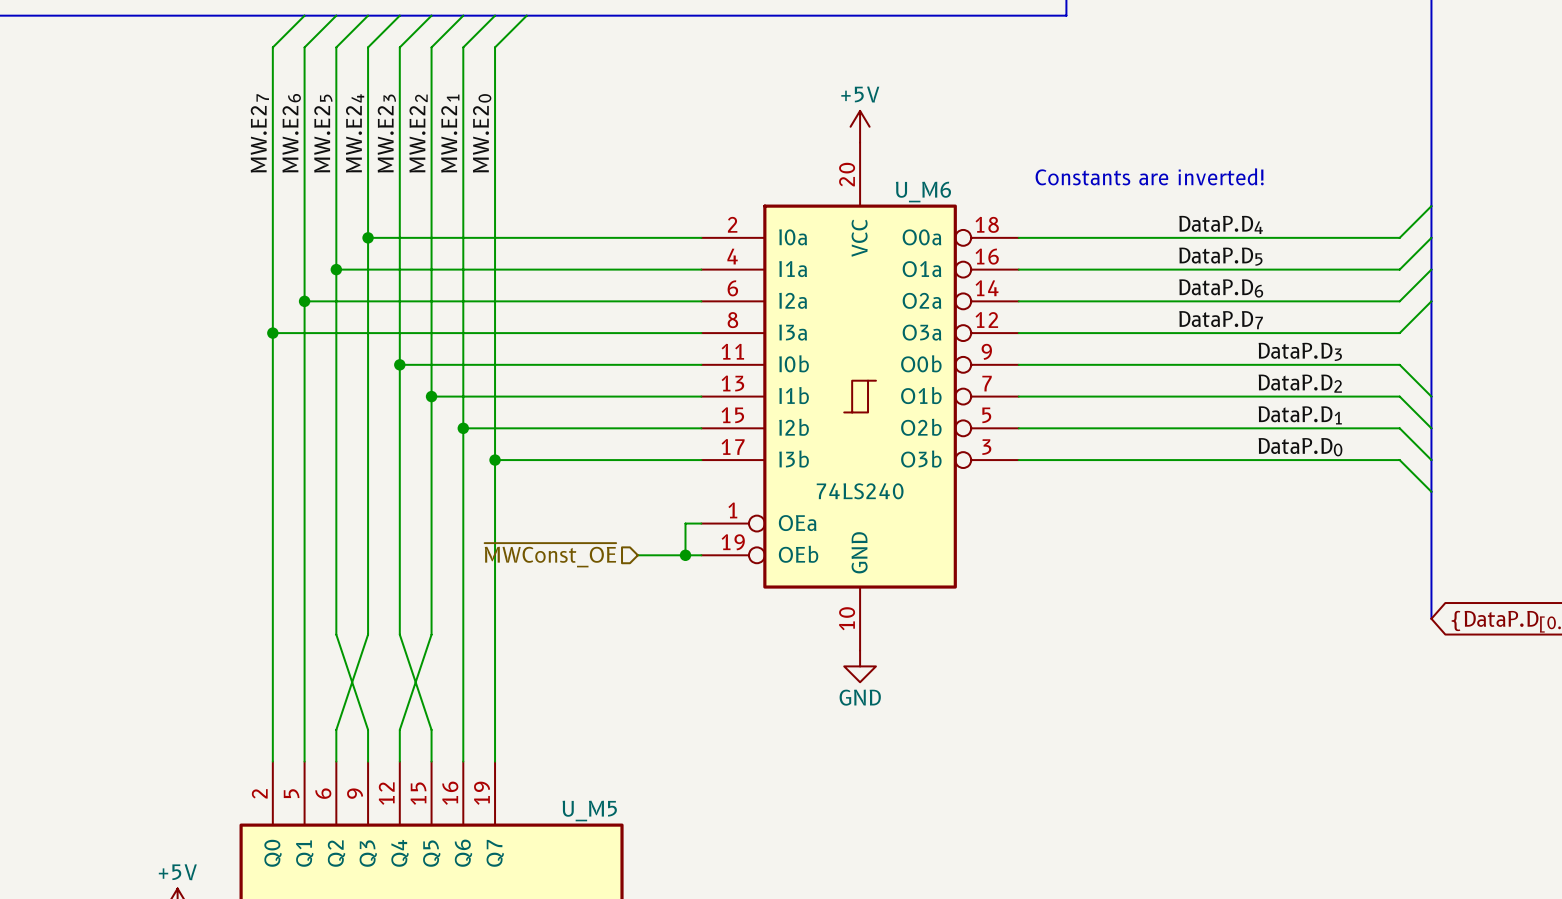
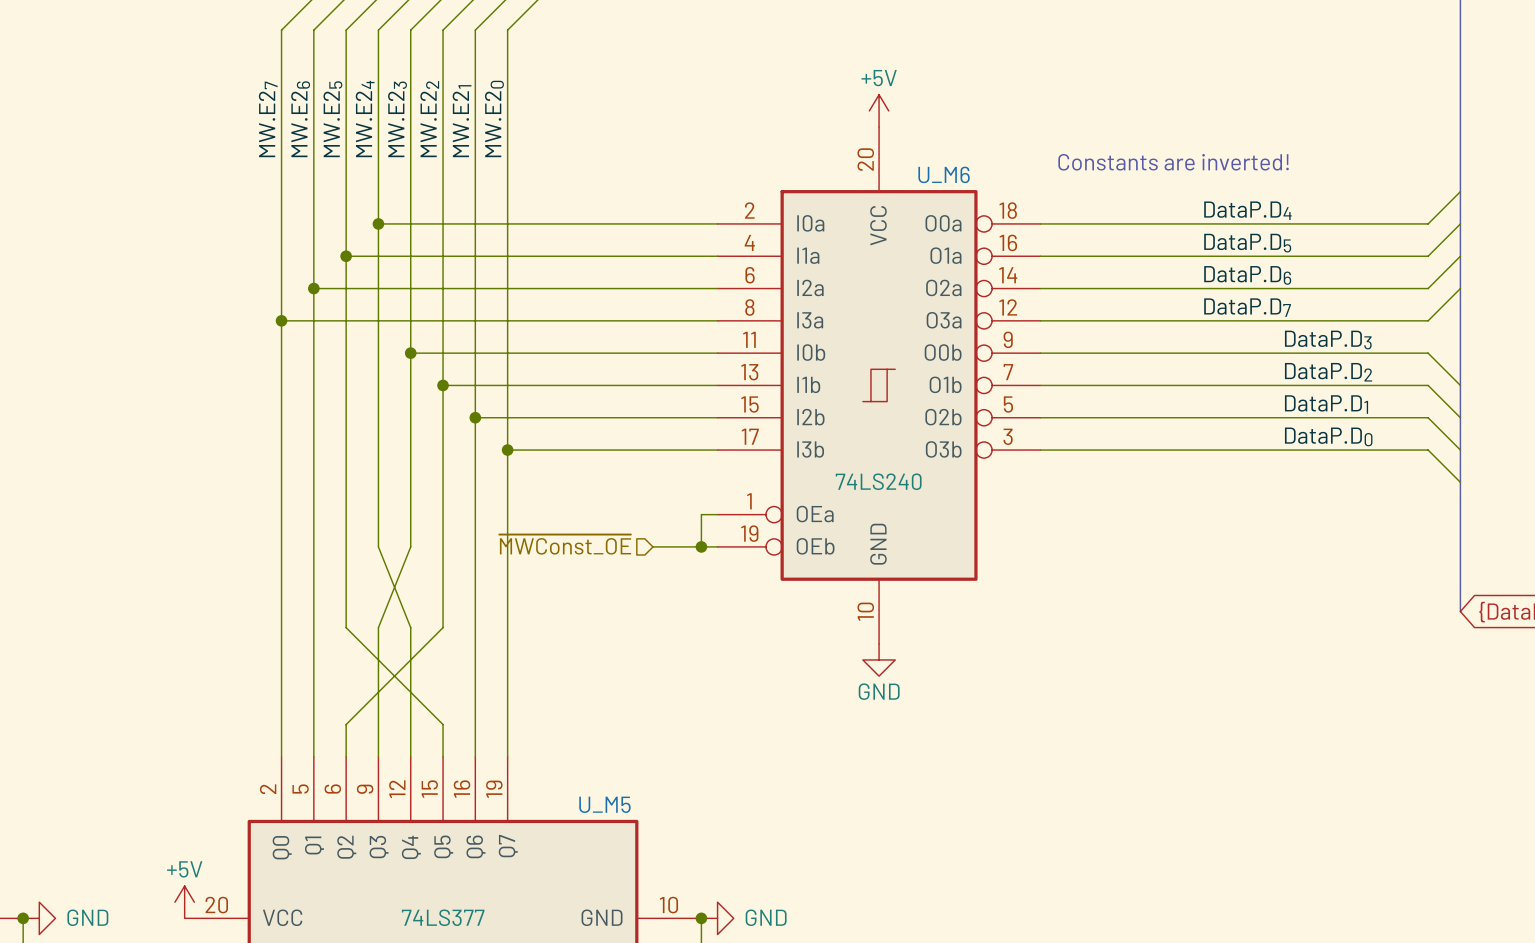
wire: (368, 555) (368, 634) (336, 729) -> (378, 546) (410, 627) (410, 724)
wire: (399, 555) (399, 634) (431, 729) -> (410, 546) (378, 627) (378, 724)
wire: (336, 634) (368, 729) -> (346, 627) (443, 724)
wire: (431, 634) (399, 729) -> (443, 627) (346, 724)

